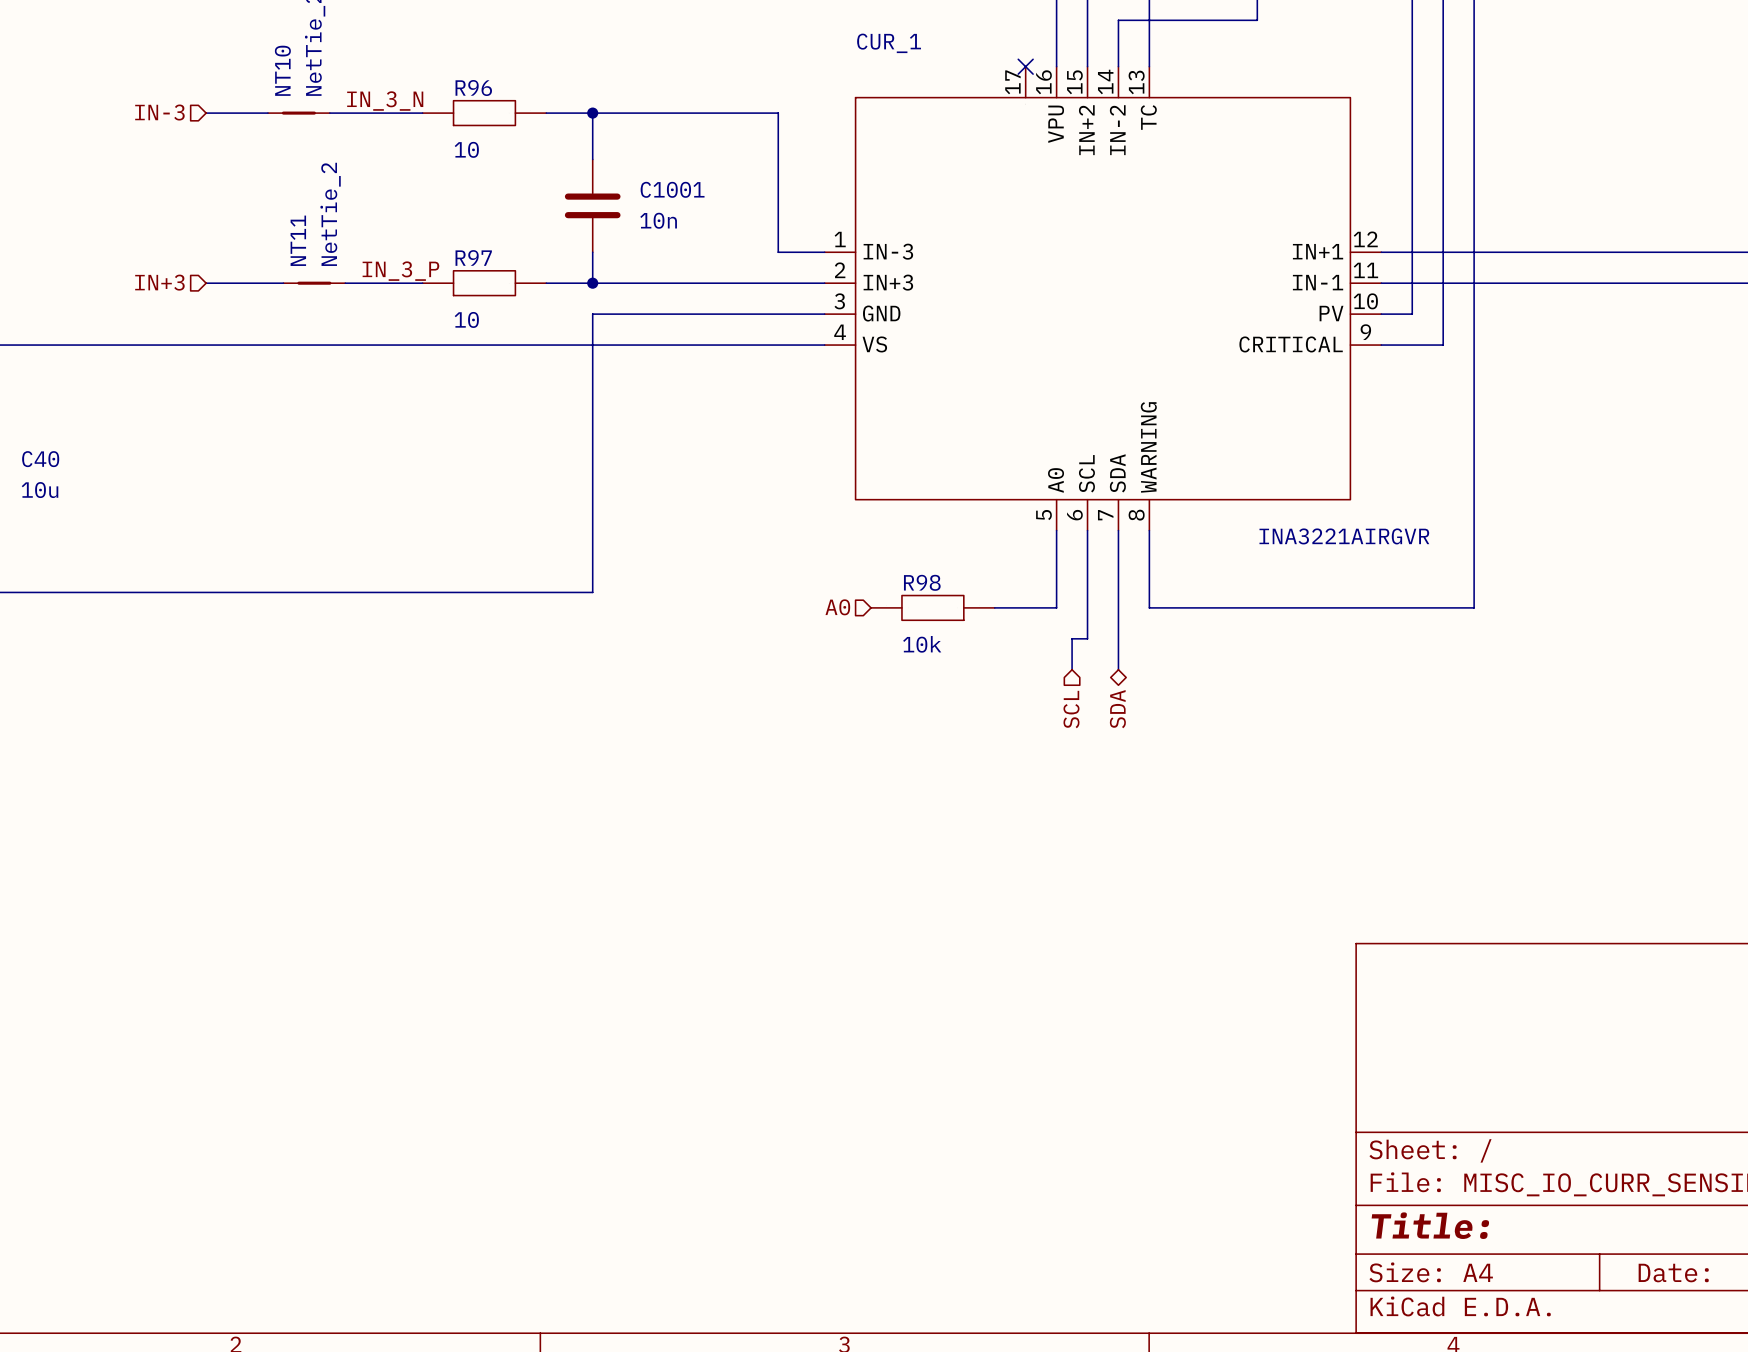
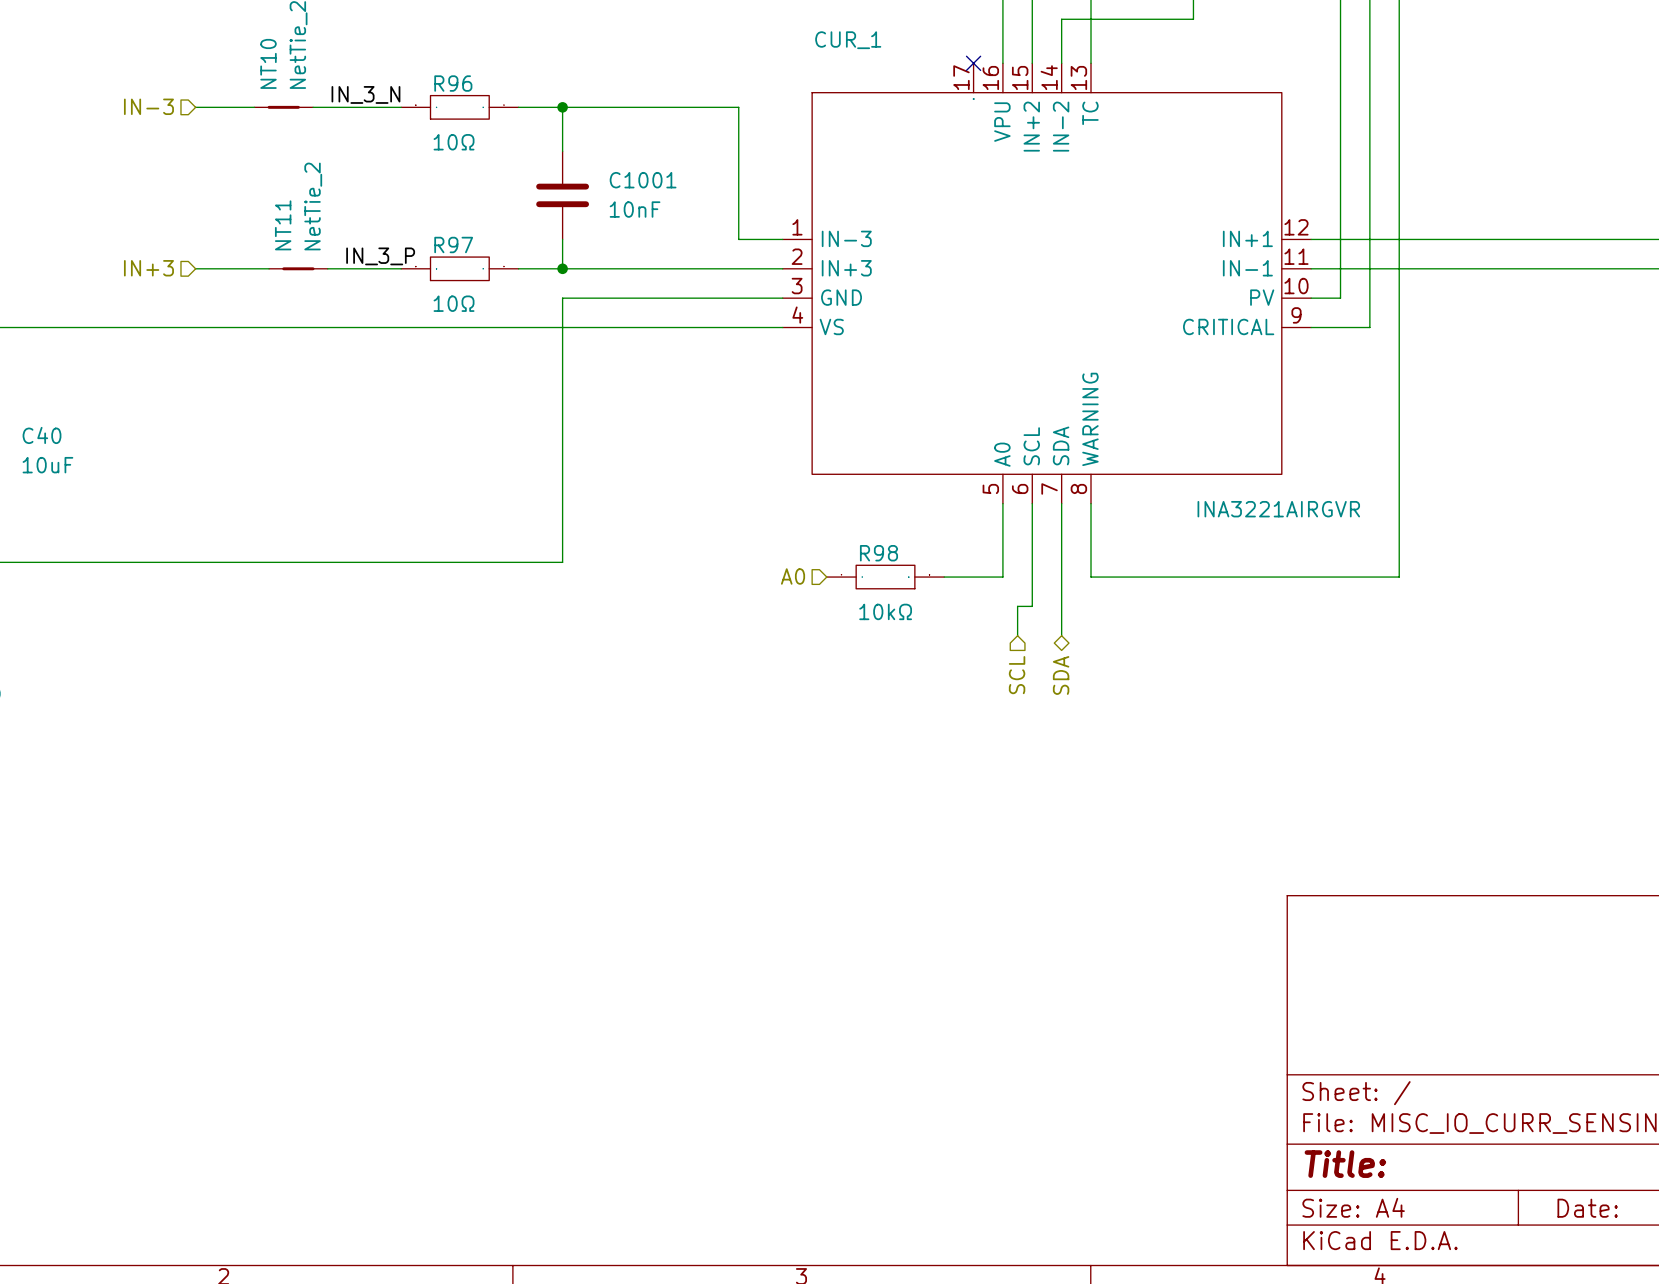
R96 value: 10 (466, 149) -> 10Ω (454, 142)
C1001 value: 10n (658, 220) -> 10nF (635, 209)
R97 value: 10 (466, 319) -> 10Ω (454, 303)
C40 value: 10u (40, 490) -> 10uF (47, 465)
R98 value: 10k (922, 644) -> 10kΩ (885, 611)

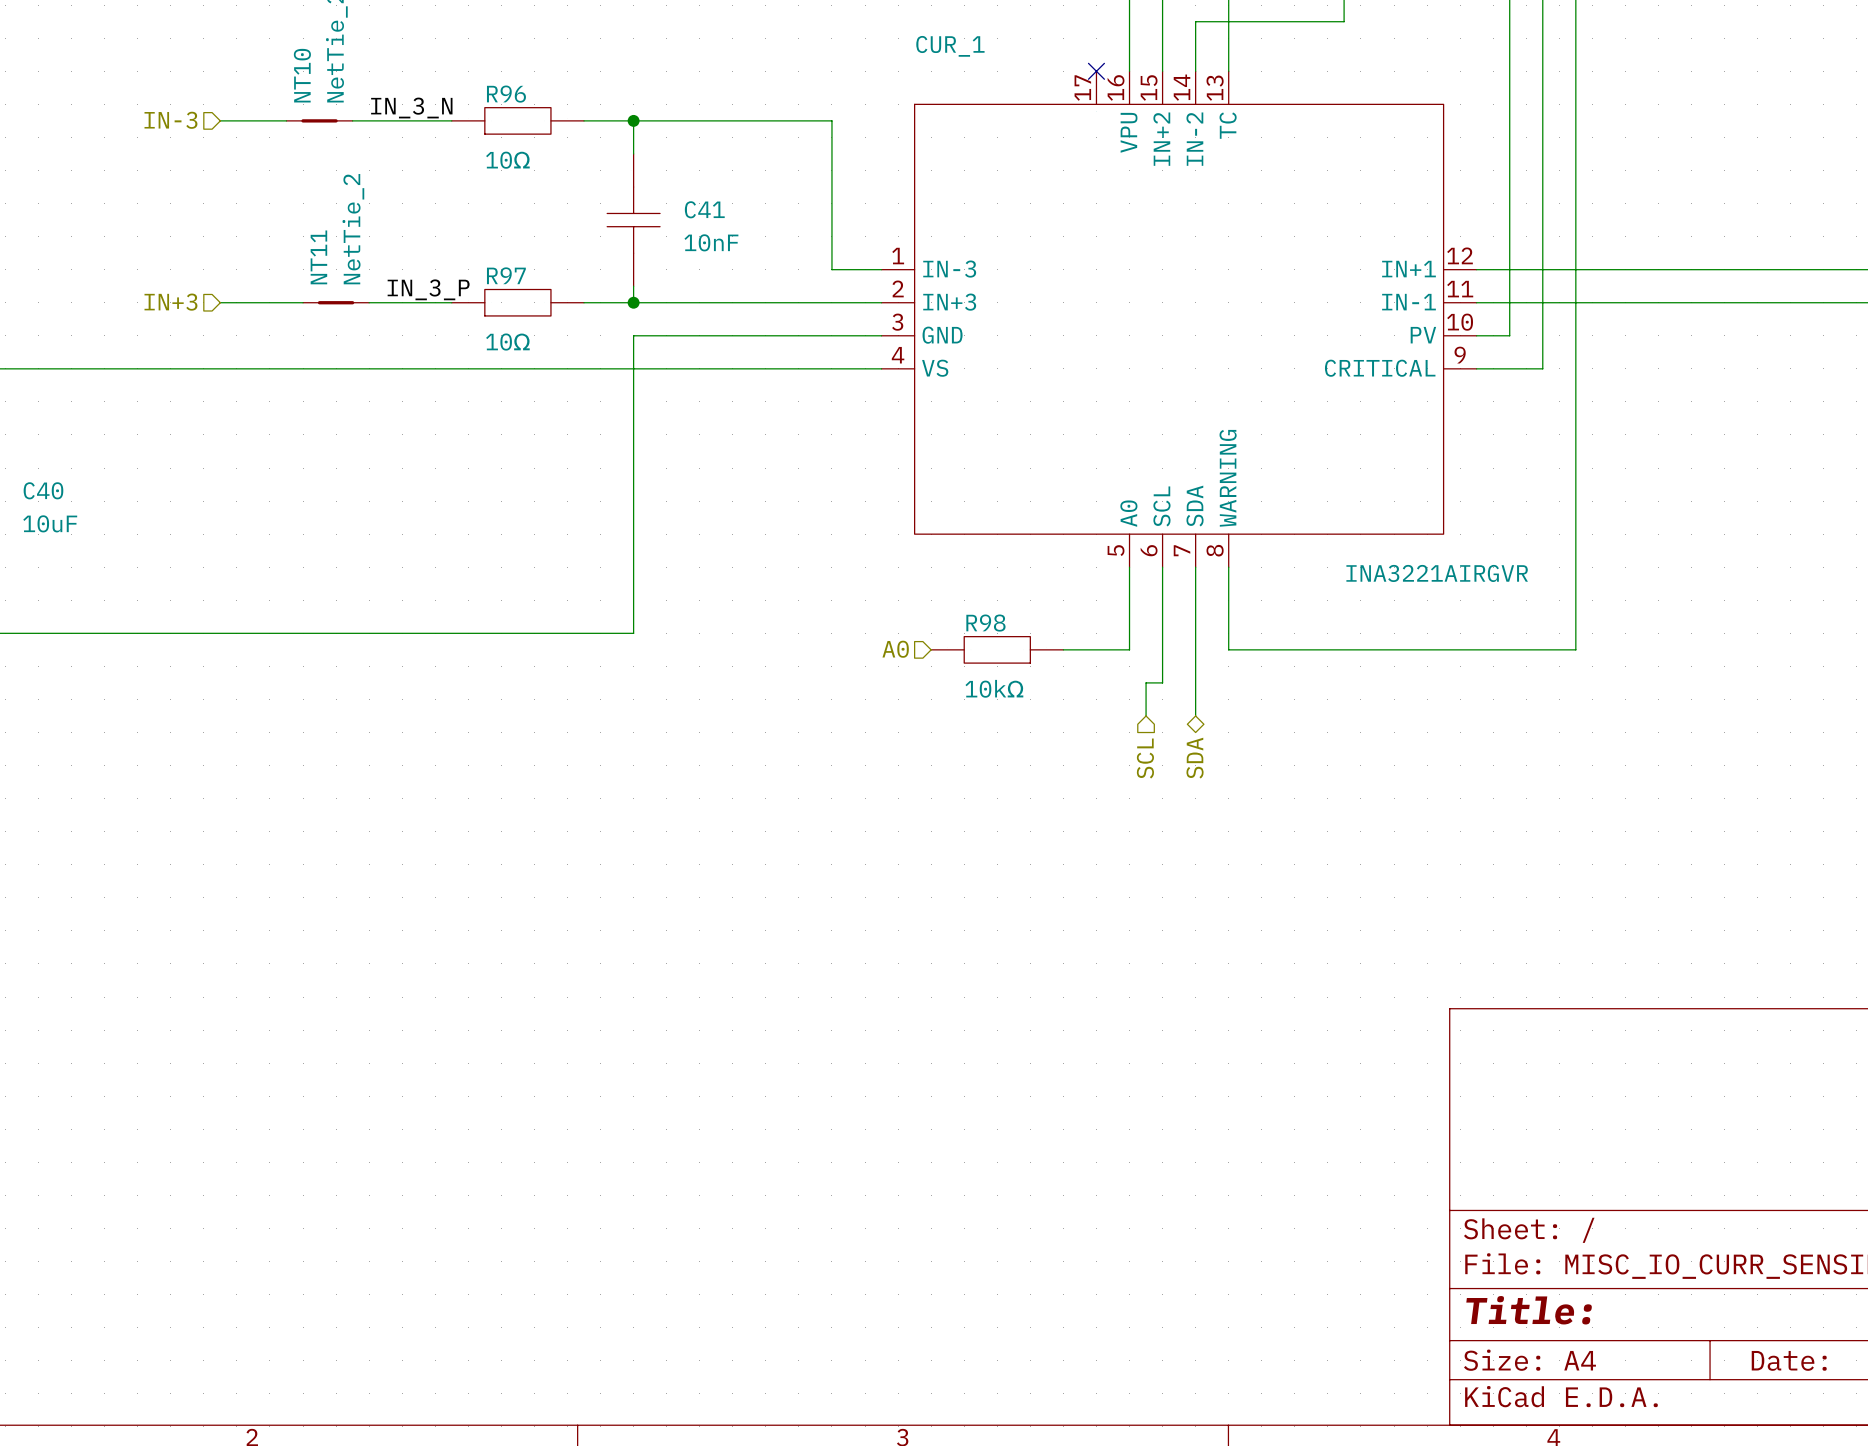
C1001: 10nF (562, 195) -> none
C41: none -> 10nF (633, 220)

